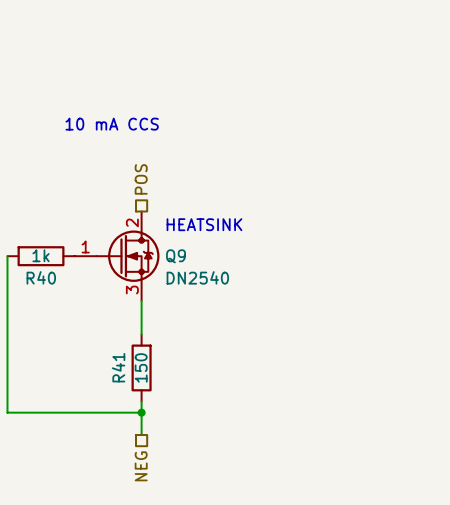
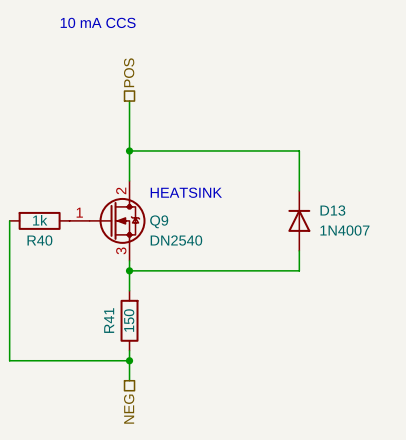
wire: none -> (129, 101) (129, 180)
text position: 10 mA CCS (112, 124) -> 10 mA CCS (98, 22)
wire: none -> (129, 150) (299, 150) (299, 190)
junction: none -> (129, 150)
hierarchical label position: POS (141, 179) -> POS (129, 72)
D13: none -> 1N4007 (299, 220)
wire: none -> (299, 250) (299, 270) (129, 270)
junction: none -> (129, 270)

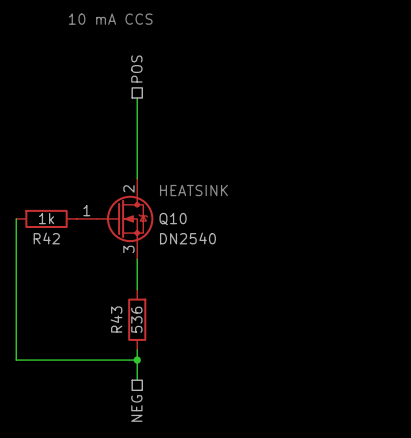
wire: (129, 150) (299, 150) (299, 190) -> none
junction: (129, 150) -> none
D13: 1N4007 (299, 220) -> none
Q9 name: Q9 (159, 221) -> Q10 (173, 219)
R40 name: R40 (39, 240) -> R42 (46, 238)
wire: (299, 250) (299, 270) (129, 270) -> none
junction: (129, 270) -> none
R41 name: R41 (109, 320) -> R43 (116, 319)
R41 value: 150 (129, 320) -> 536 (136, 319)

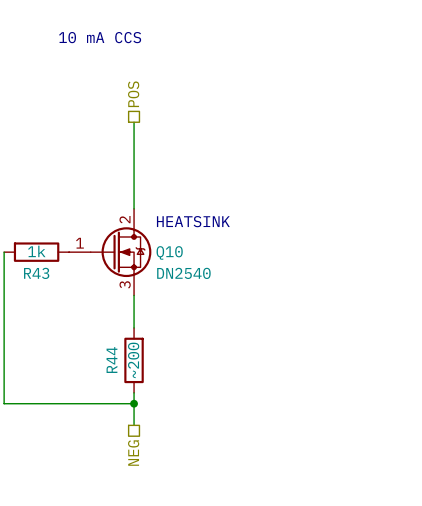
R42 name: R42 (46, 238) -> R43 (36, 273)
R43 name: R43 (116, 319) -> R44 (111, 360)
R43 value: 536 (136, 319) -> ~200 (133, 360)

